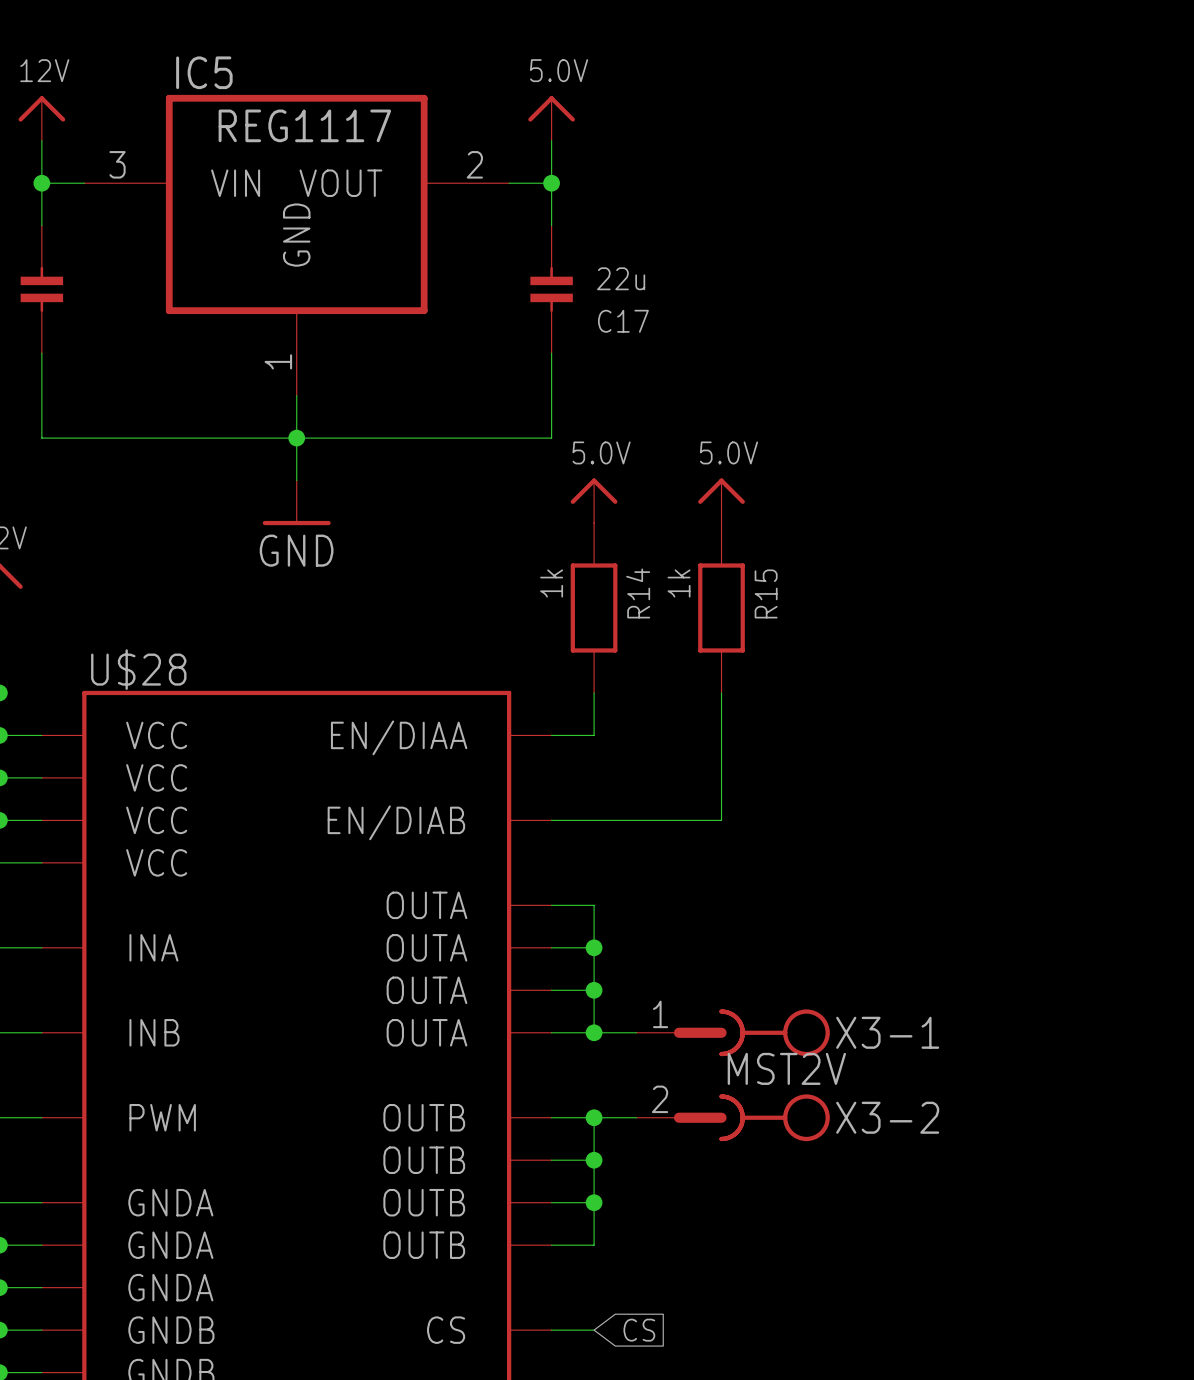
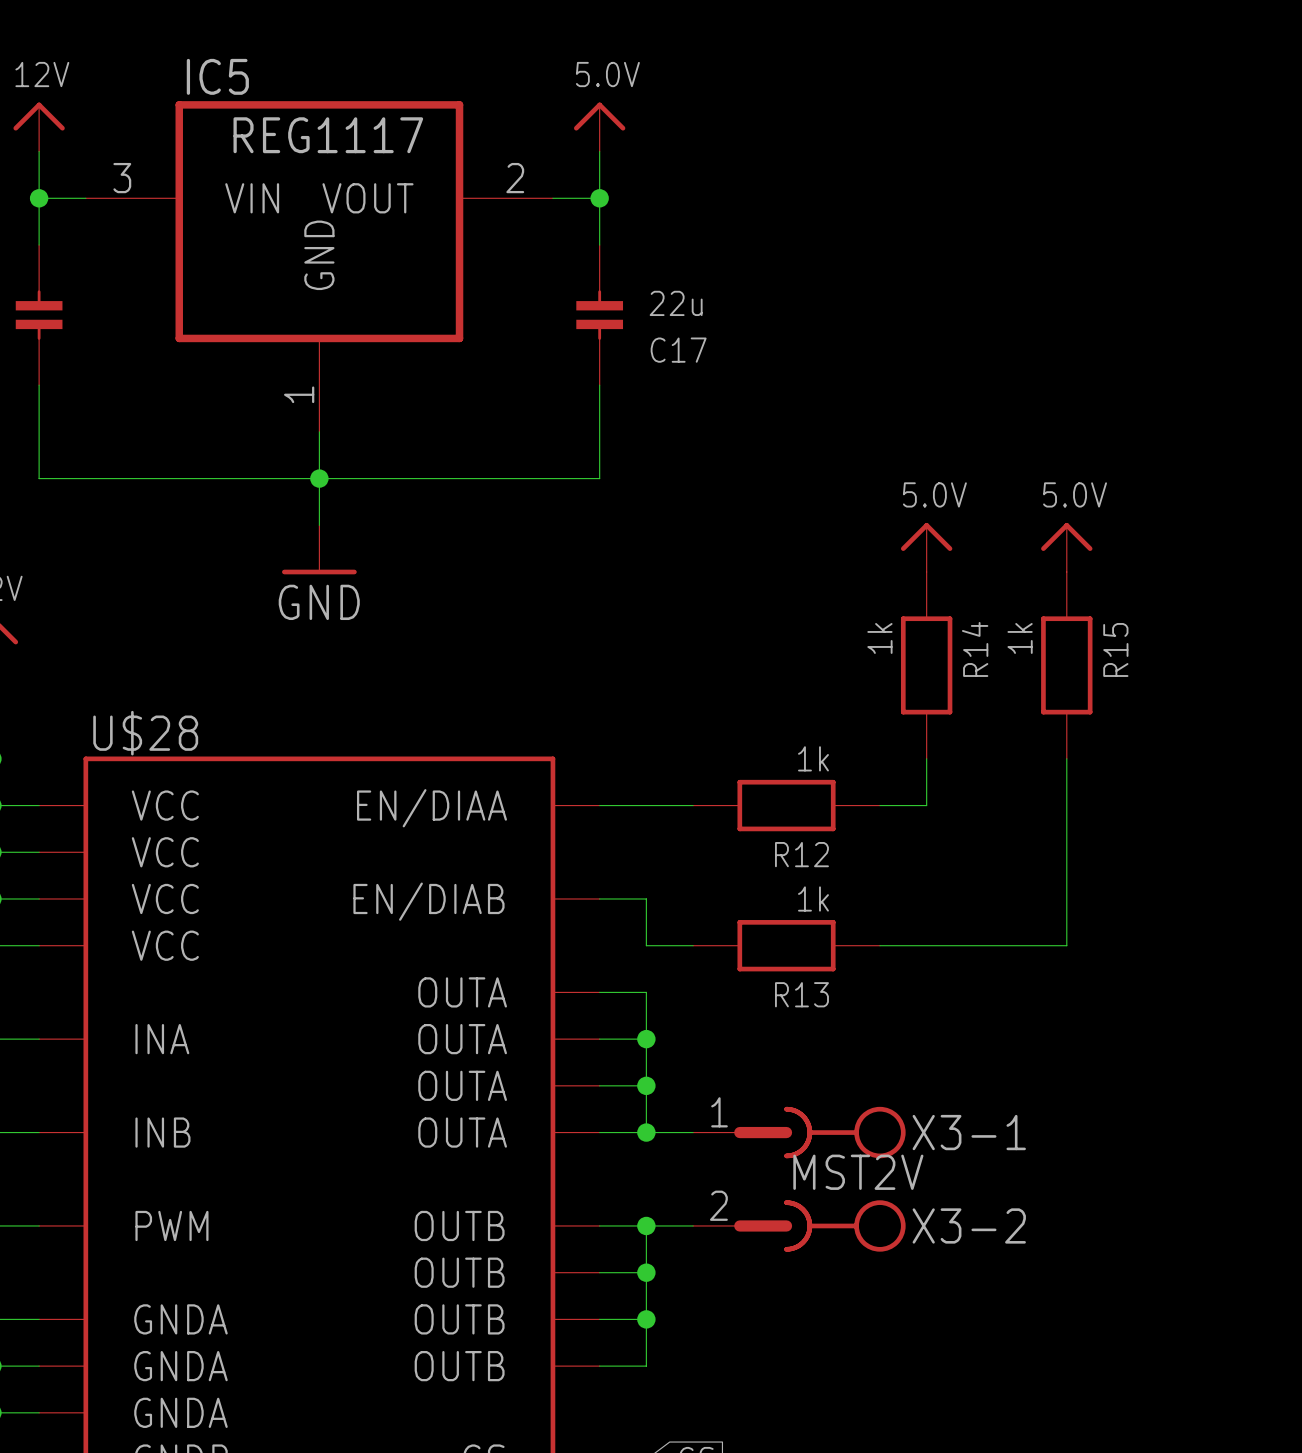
power symbol: 5.0V (594, 500) -> none
power symbol: 5.0V (721, 500) -> none
power symbol: none -> 5.0V (926, 547)
power symbol: none -> 5.0V (1066, 547)
R14 position: (594, 608) -> (926, 665)
R15 position: (721, 608) -> (1066, 665)
wire: (594, 692) (594, 735) -> (693, 805) (646, 805)
wire: (721, 692) (721, 820) (594, 820) -> (693, 945) (646, 945) (646, 898)
wire: none -> (926, 758) (926, 805) (879, 805)
wire: none -> (1066, 758) (1066, 945) (879, 945)
R12: none -> 1k (786, 805)
R13: none -> 1k (786, 945)

